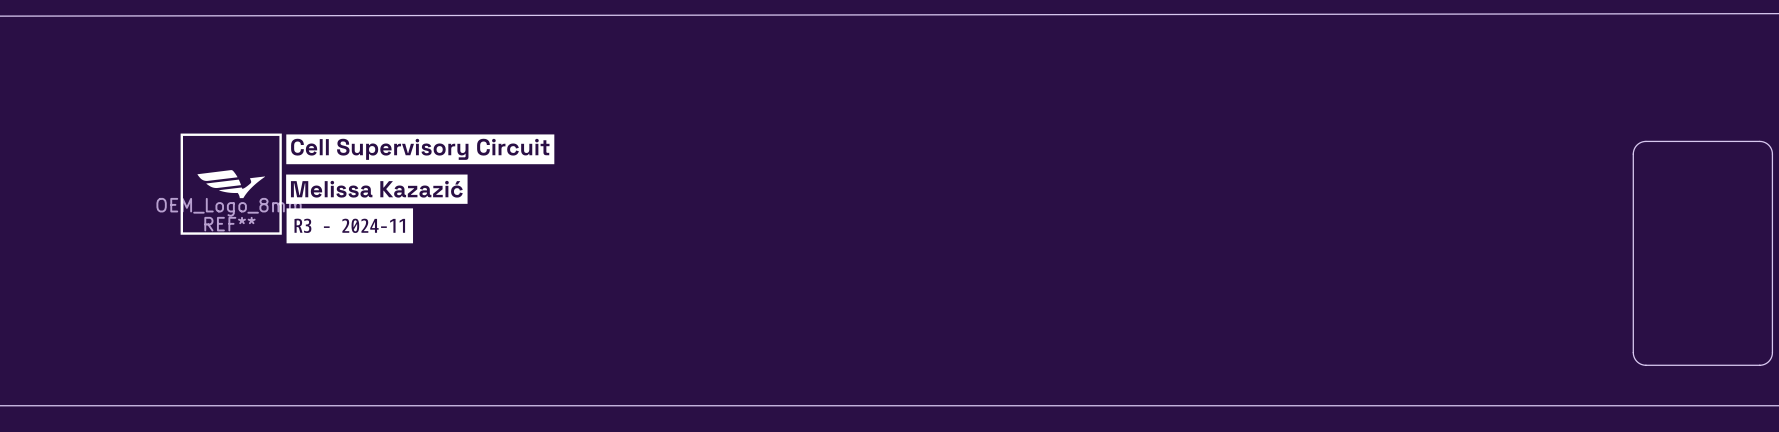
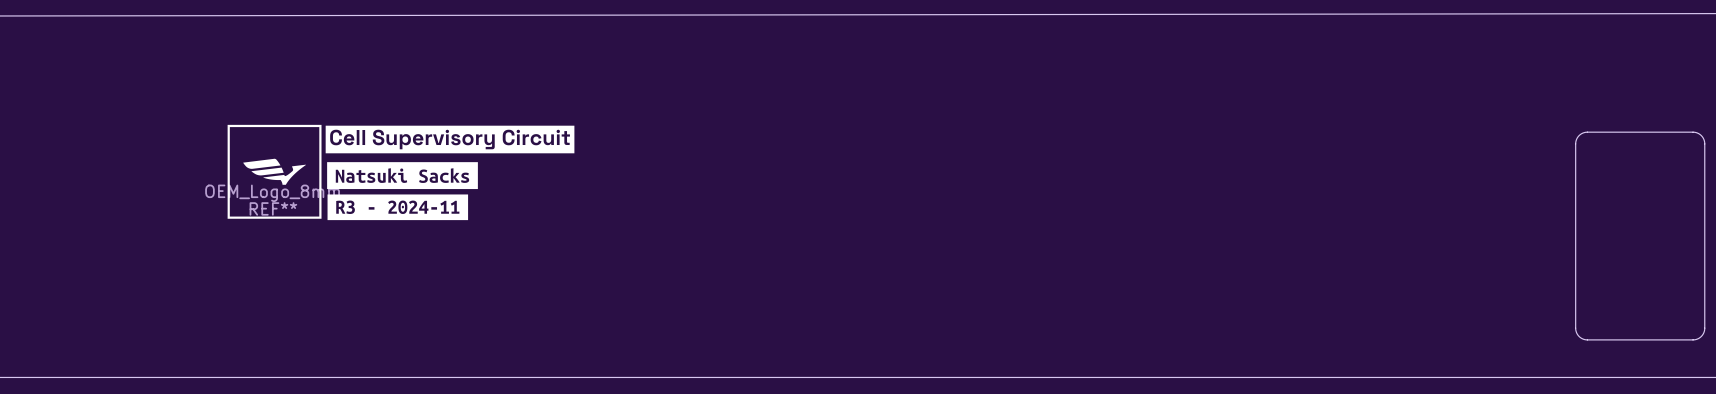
drawing shape: [286, 174, 468, 204] -> [327, 162, 478, 190]
drawing: [286, 208, 414, 244] -> none
drawing: none -> [327, 194, 469, 221]

